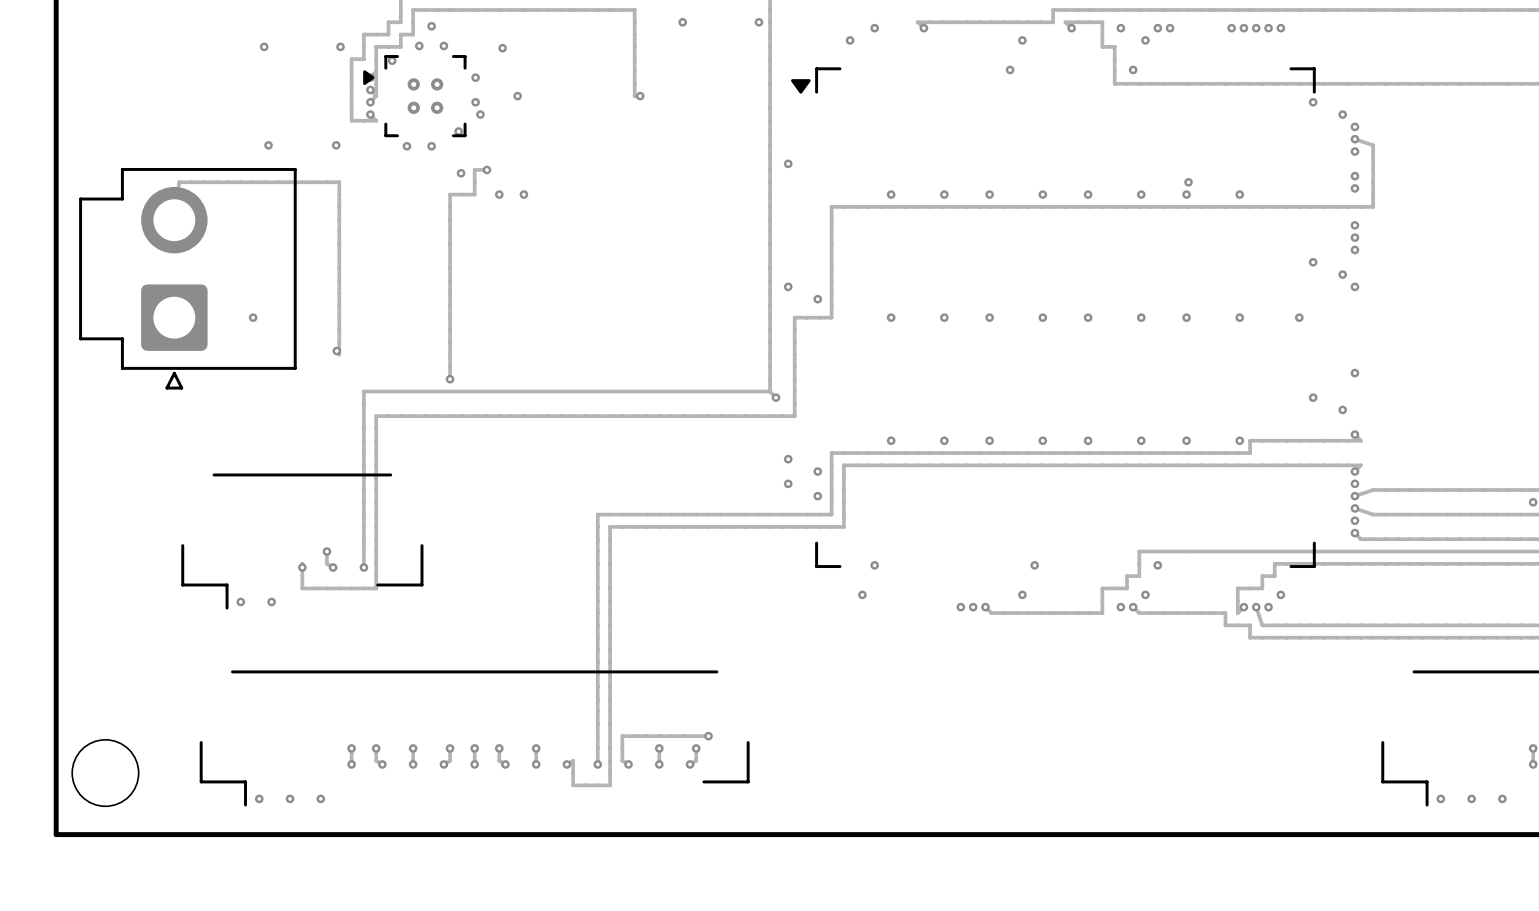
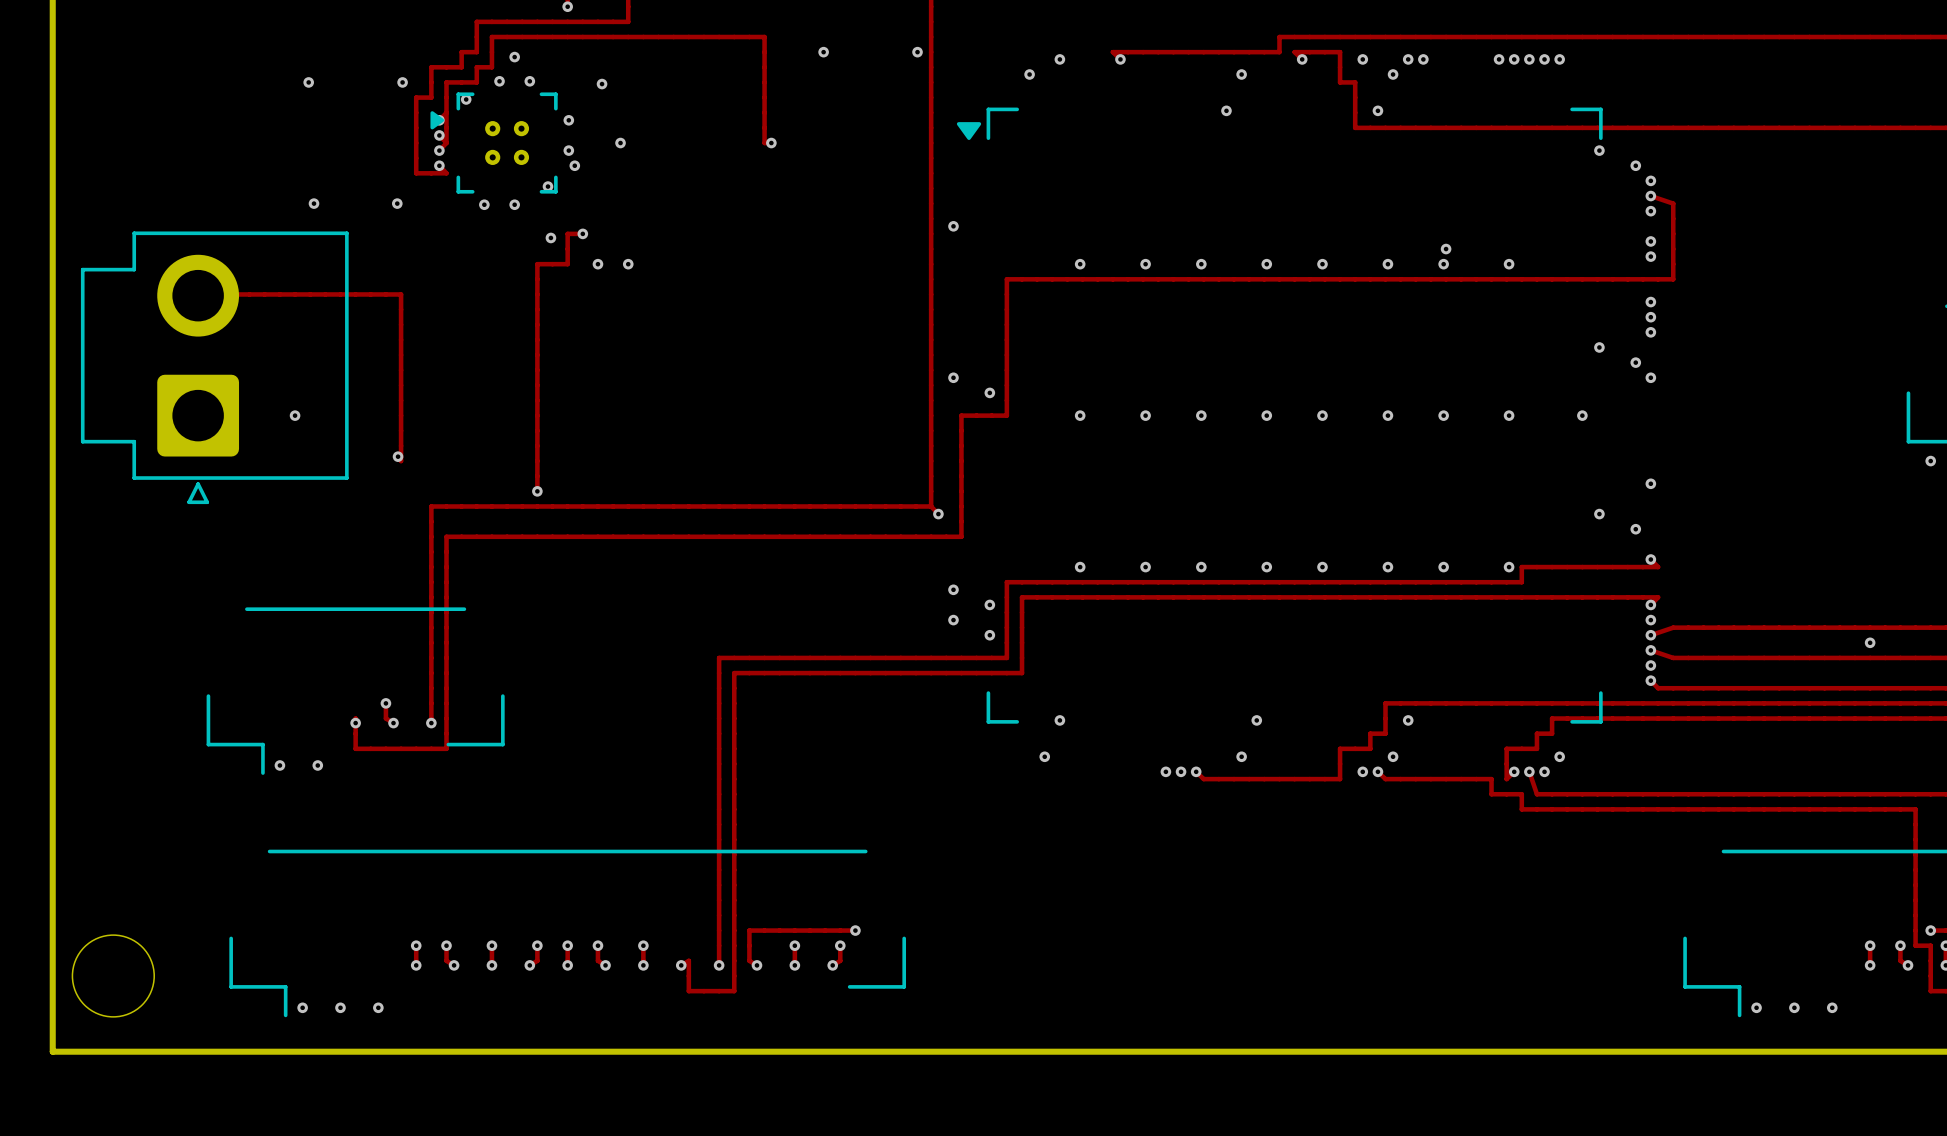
track: (339, 219) (339, 182) (179, 182) (174, 220) -> (401, 294) (198, 295)

